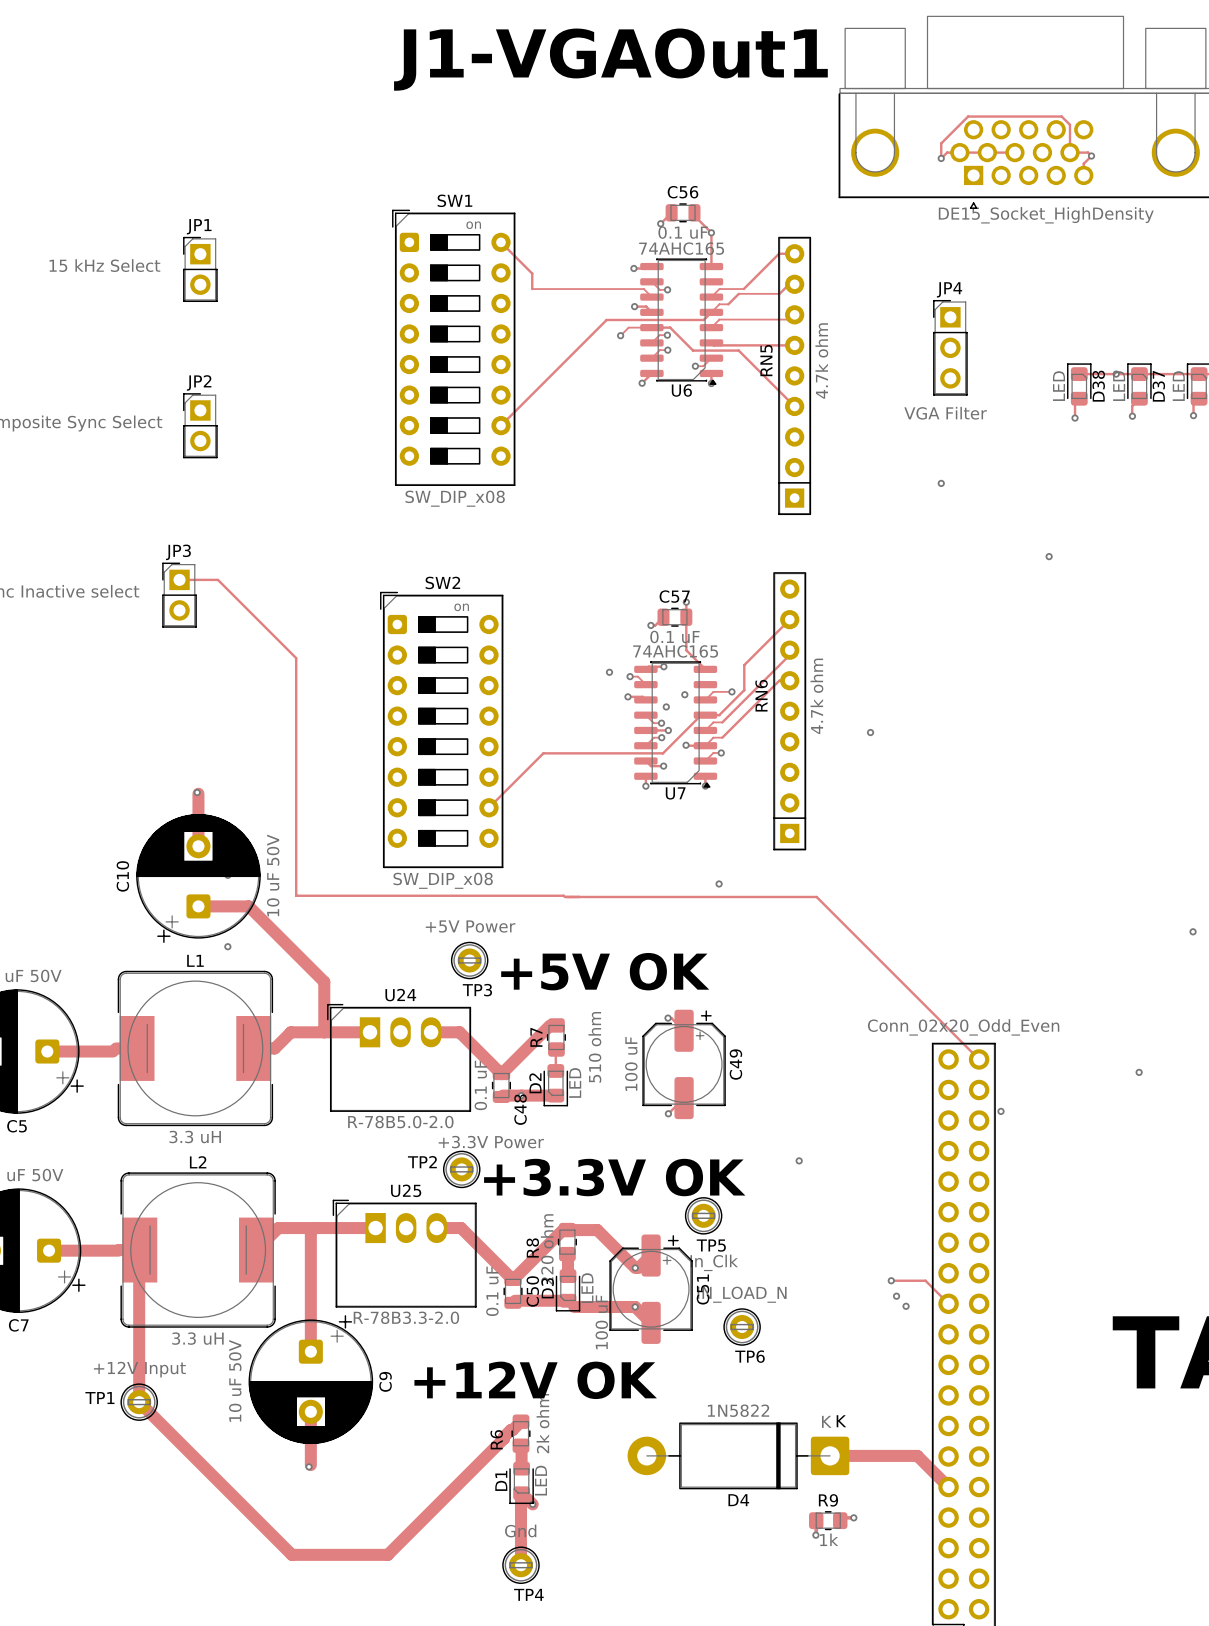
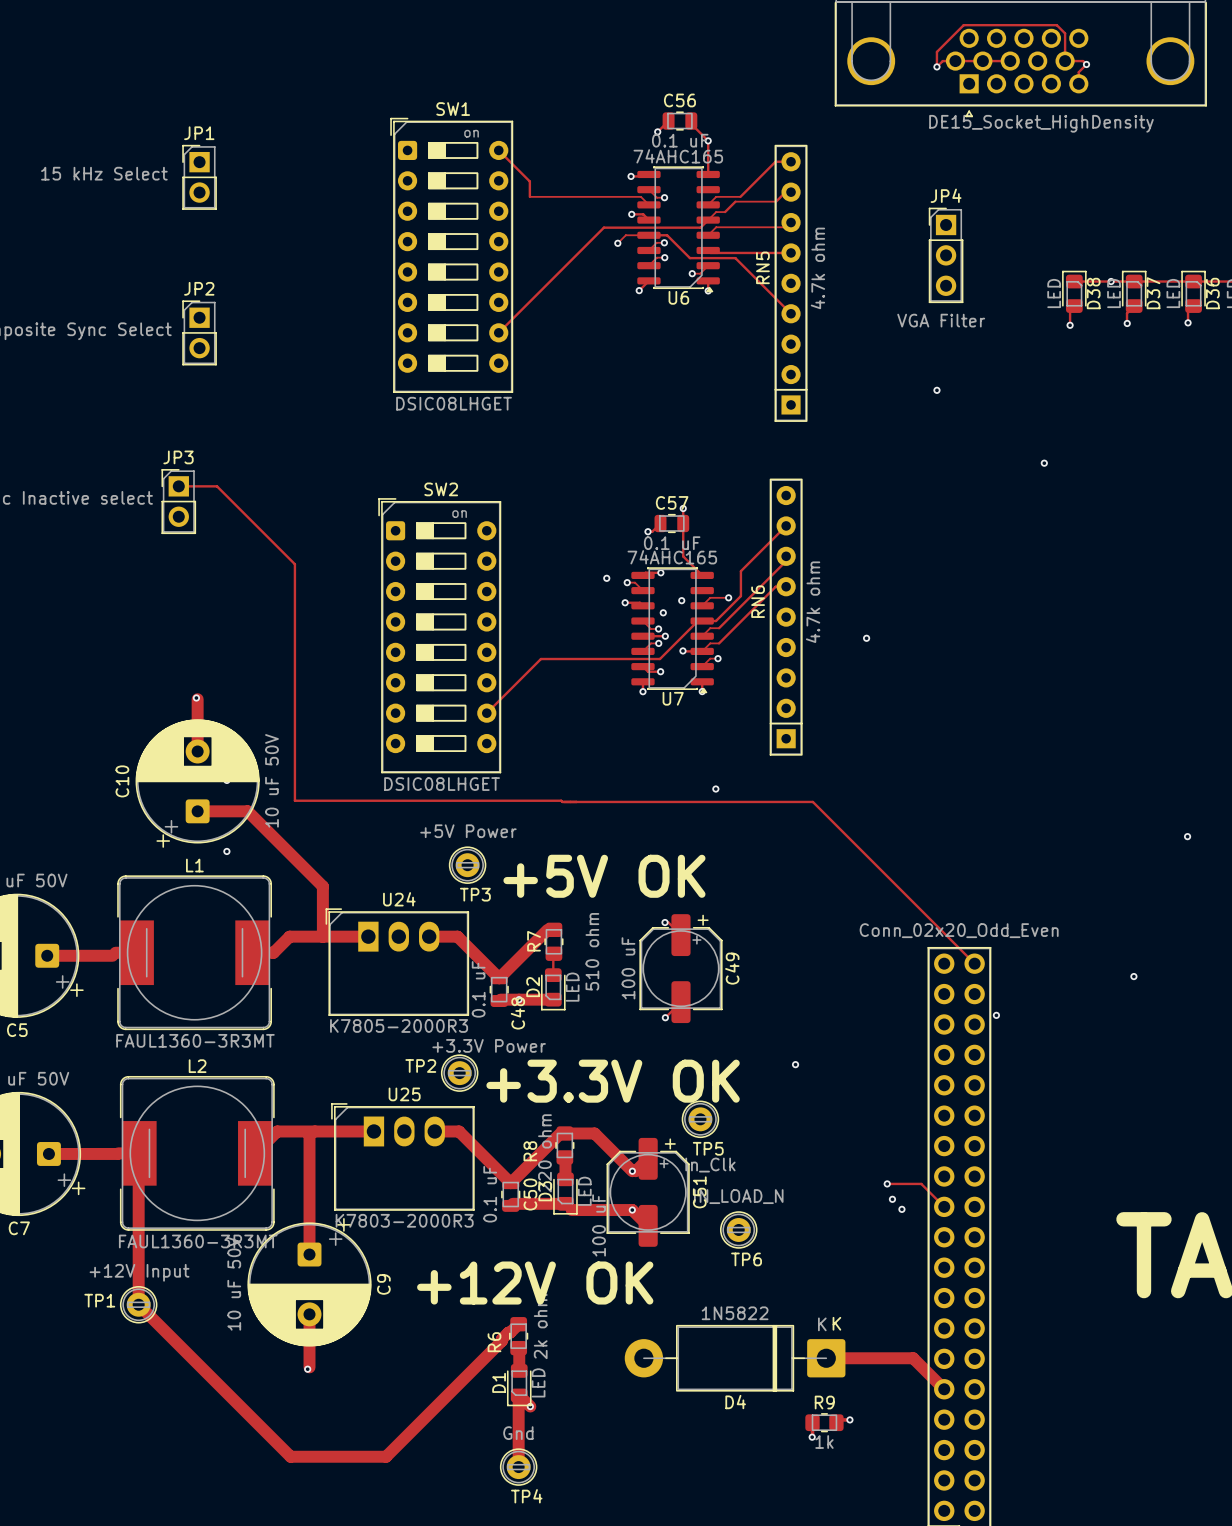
SW1 value: SW_DIP_x08 (455, 498) -> DSIC08LHGET (454, 403)
SW2 value: SW_DIP_x08 (443, 880) -> DSIC08LHGET (442, 784)
U24 value: R-78B5.0-2.0 (400, 1122) -> K7805-2000R3 (399, 1025)
L1 value: 3.3 uH (195, 1137) -> FAUL1360-3R3MT (195, 1040)
U25 value: R-78B3.3-2.0 (406, 1317) -> K7803-2000R3 (404, 1220)
L2 value: 3.3 uH (197, 1338) -> FAUL1360-3R3MT (198, 1241)

